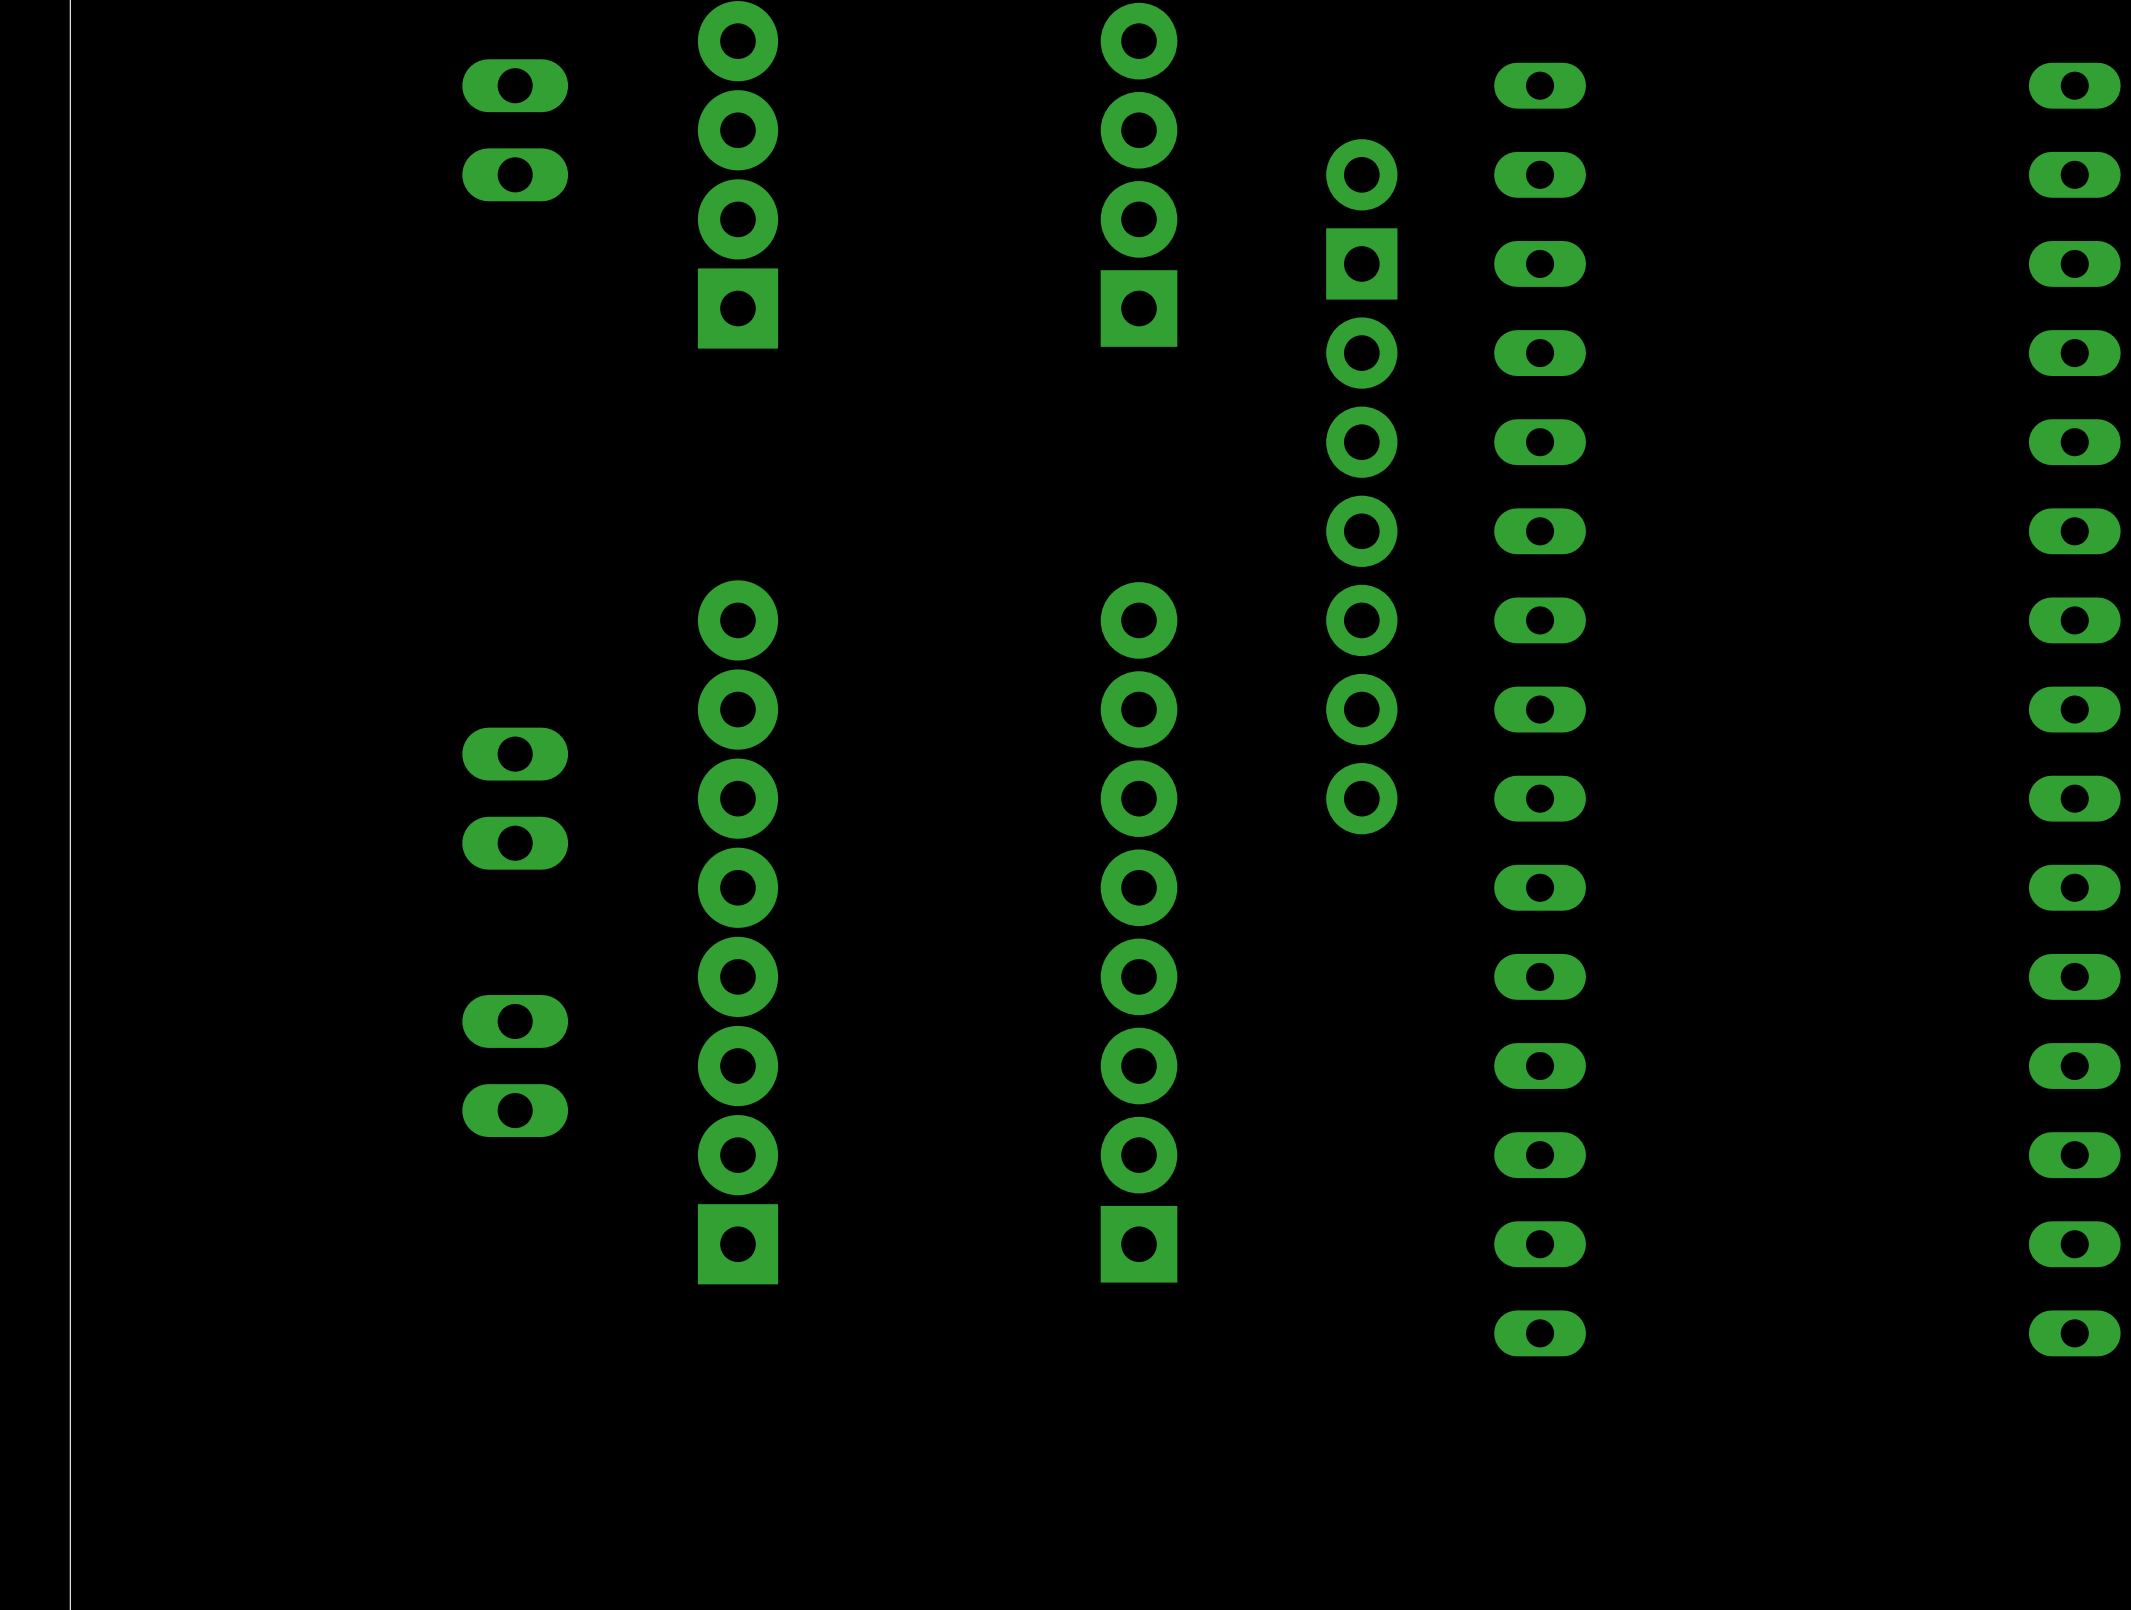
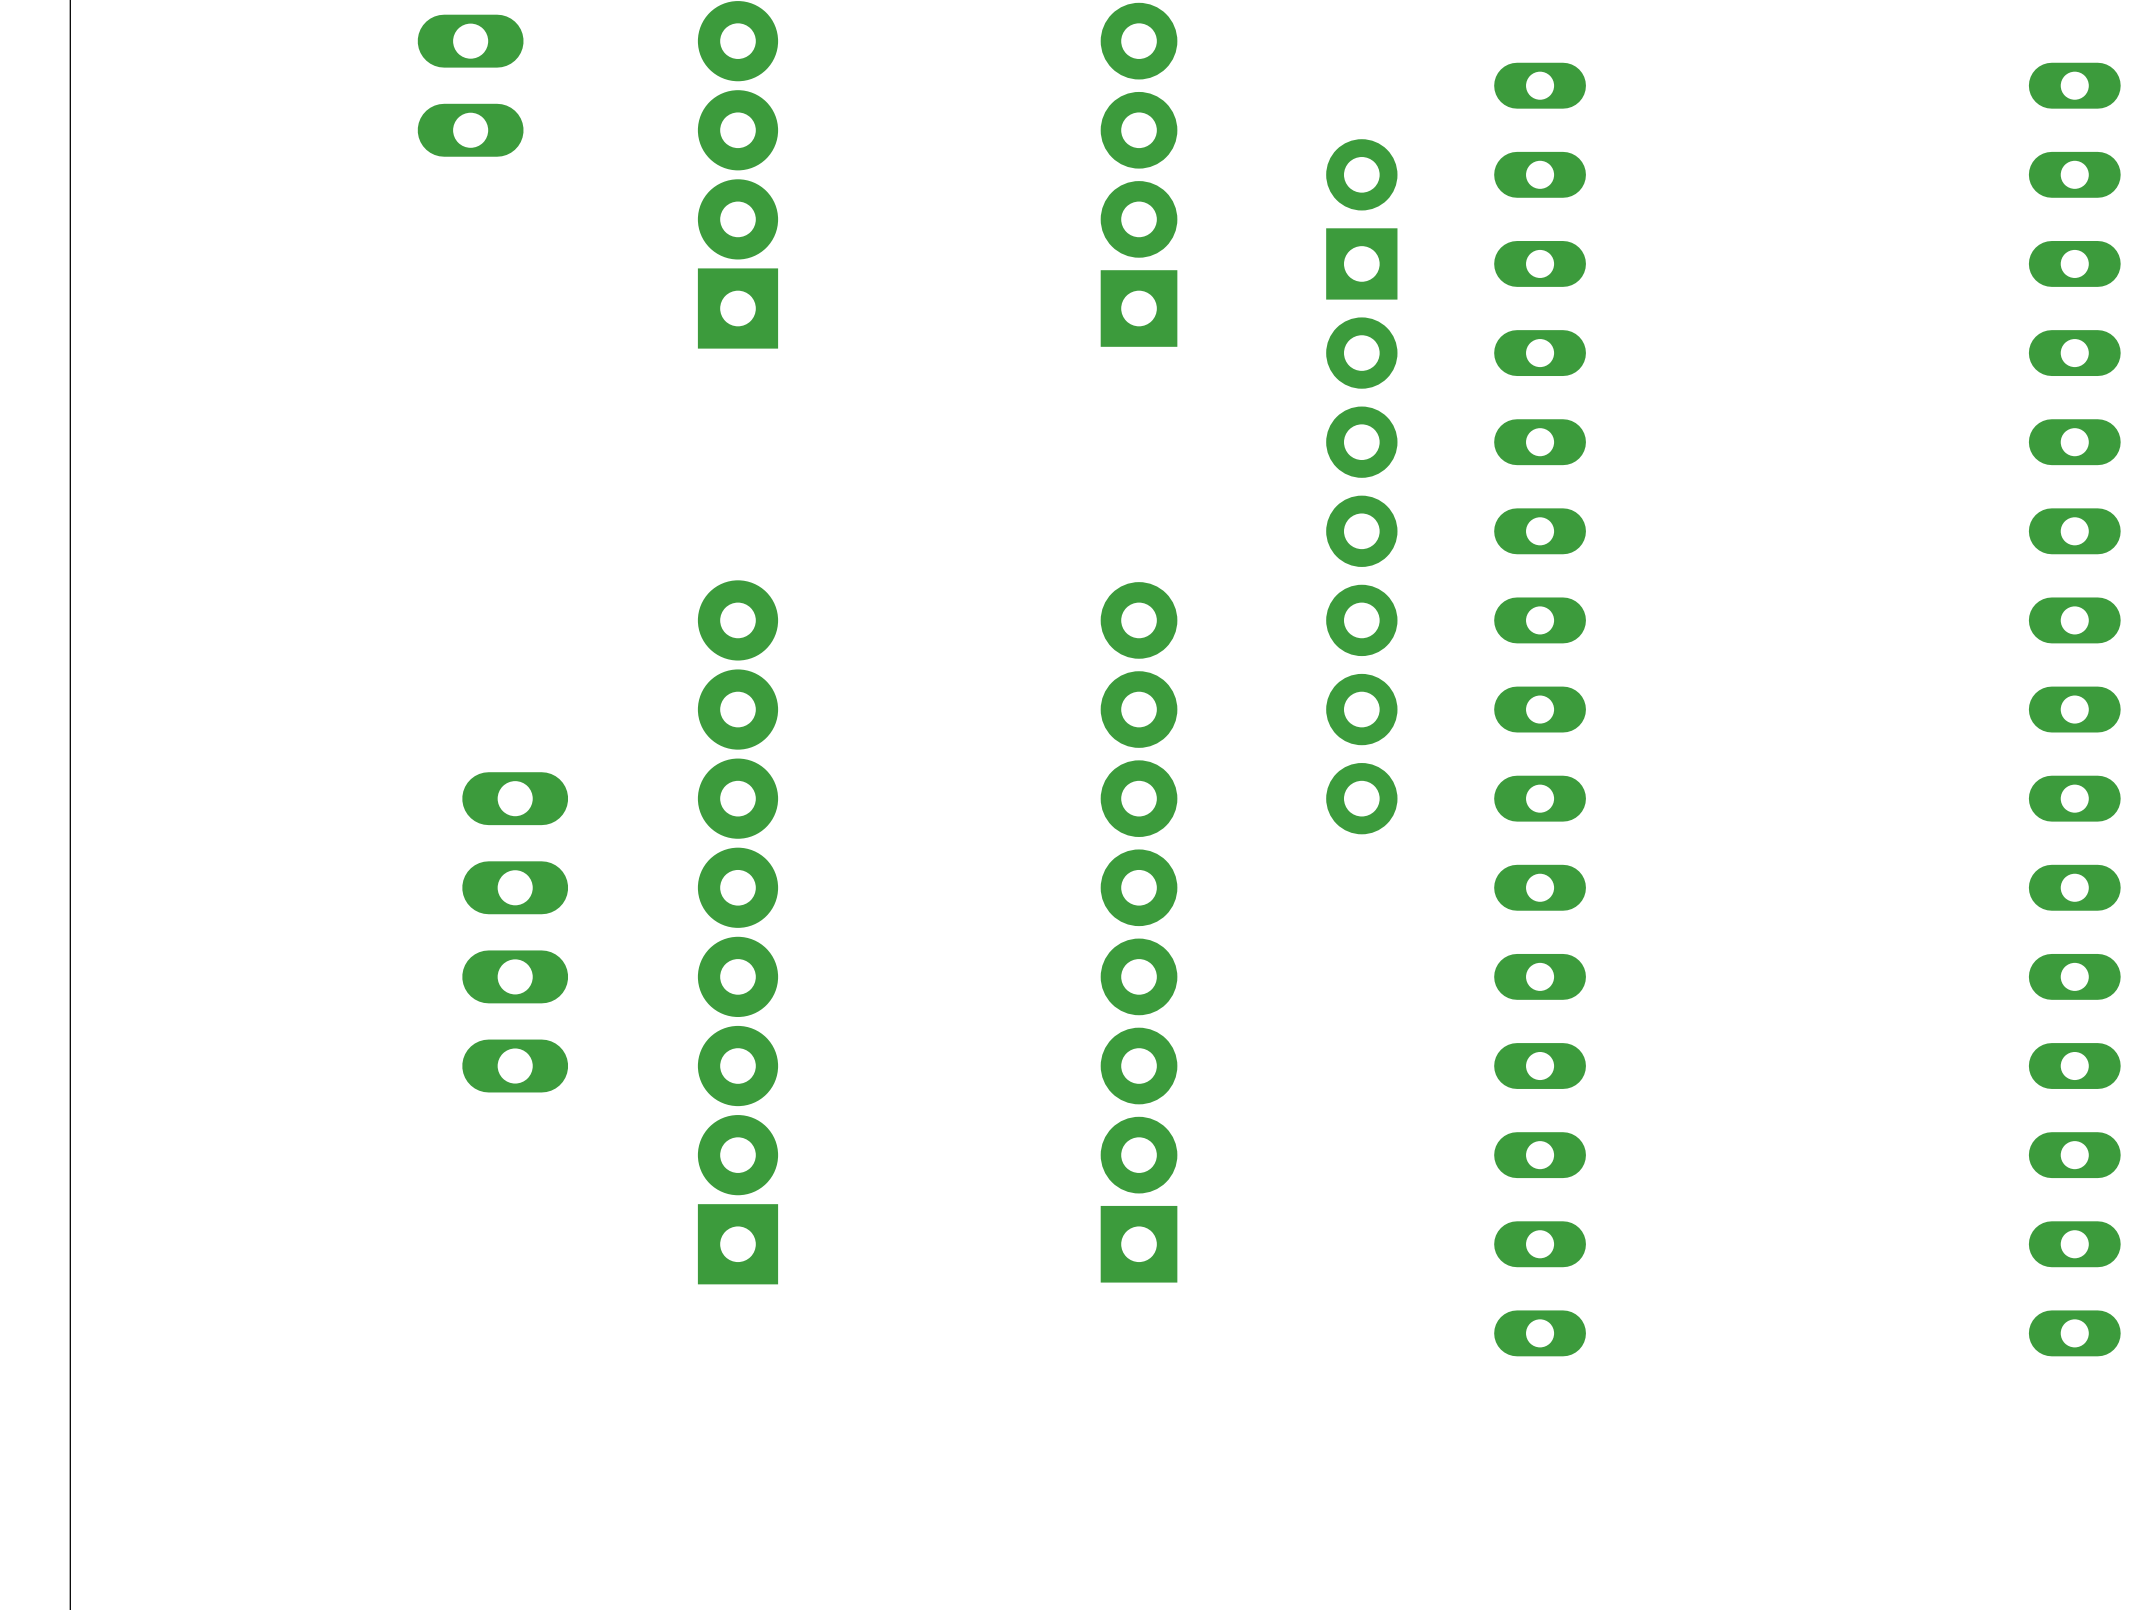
part position: (515, 130) -> (470, 85)
part position: (515, 798) -> (515, 843)
part position: (515, 1066) -> (515, 1021)

